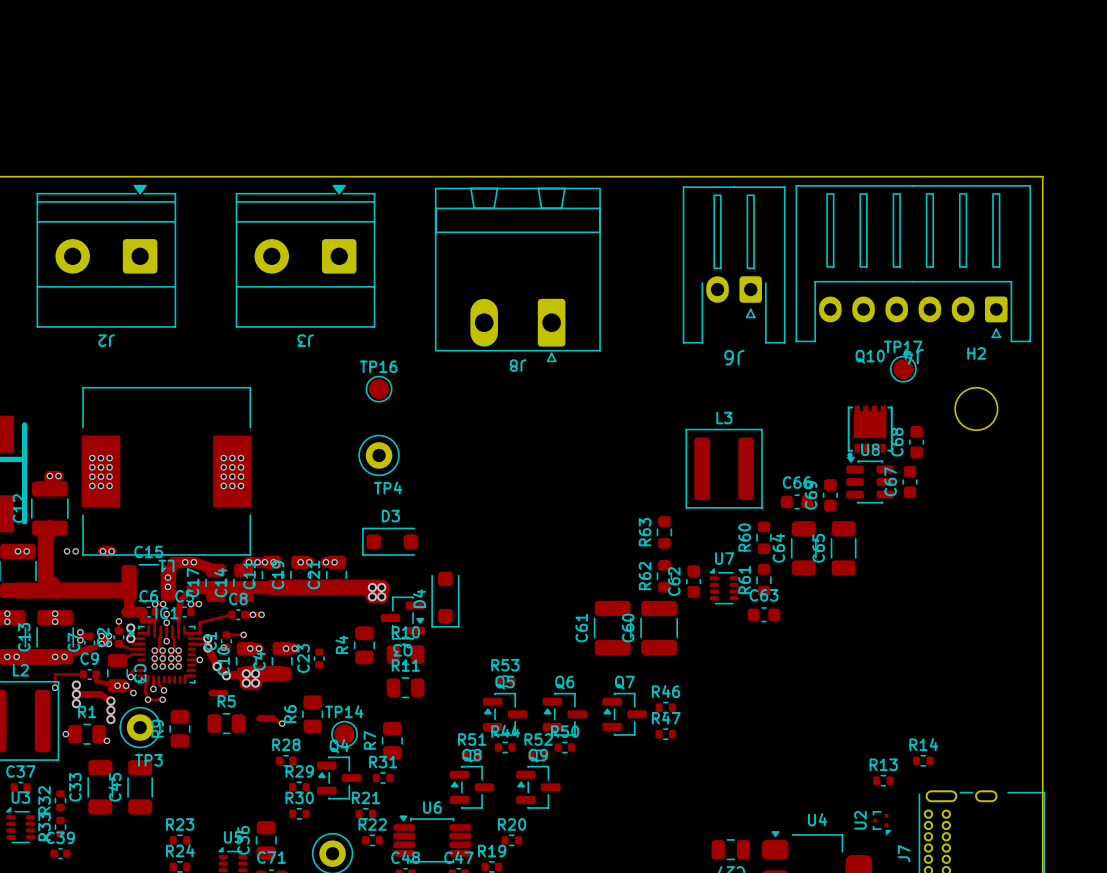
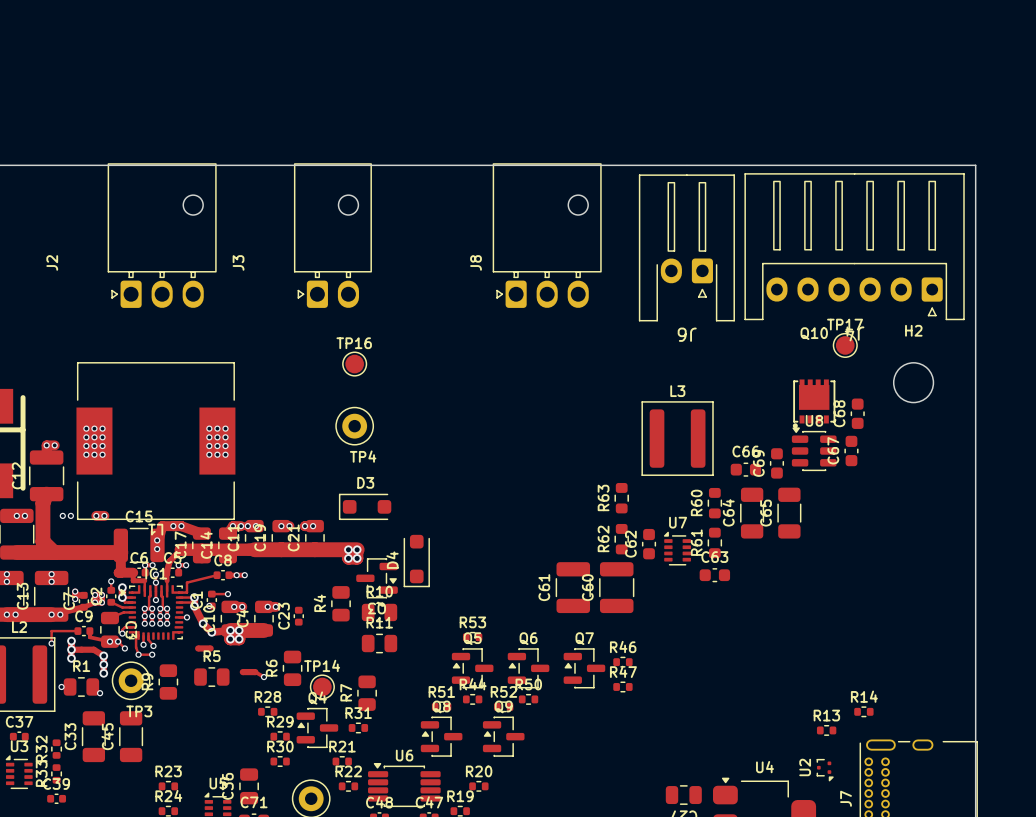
J2 footprint: [36, 184, 177, 328] -> [107, 163, 217, 308]
J3 footprint: [235, 184, 376, 328] -> [293, 163, 372, 308]
J8 footprint: [434, 187, 601, 363] -> [492, 163, 602, 308]
J2 name position: J2 (106, 340) -> J2 (52, 262)
J3 name position: J3 (305, 340) -> J3 (238, 262)
J8 name position: J8 (518, 365) -> J8 (476, 262)

